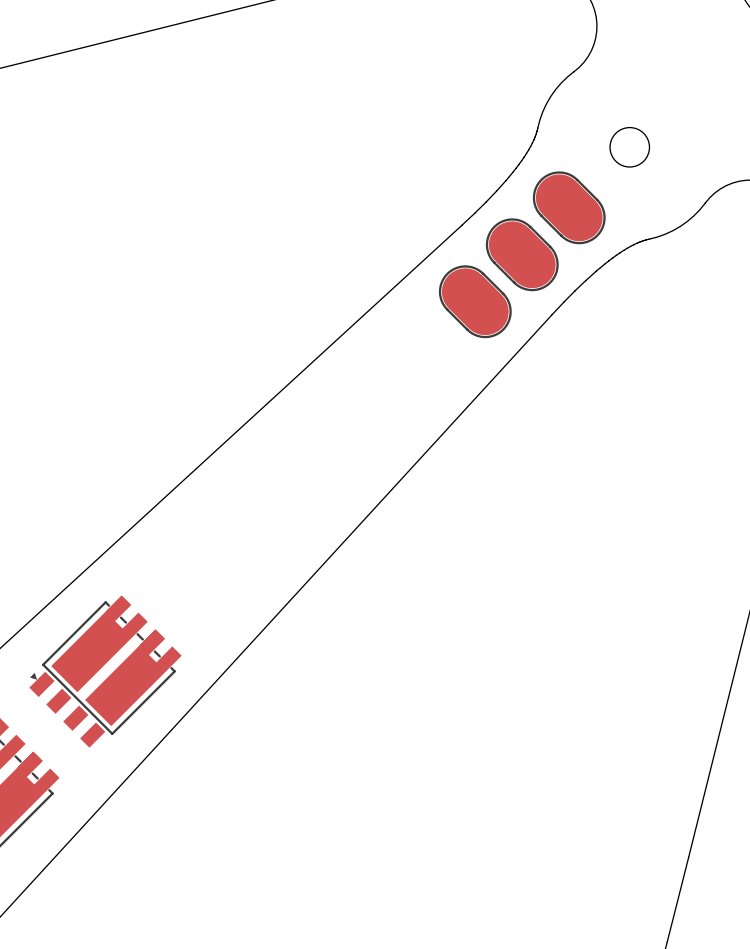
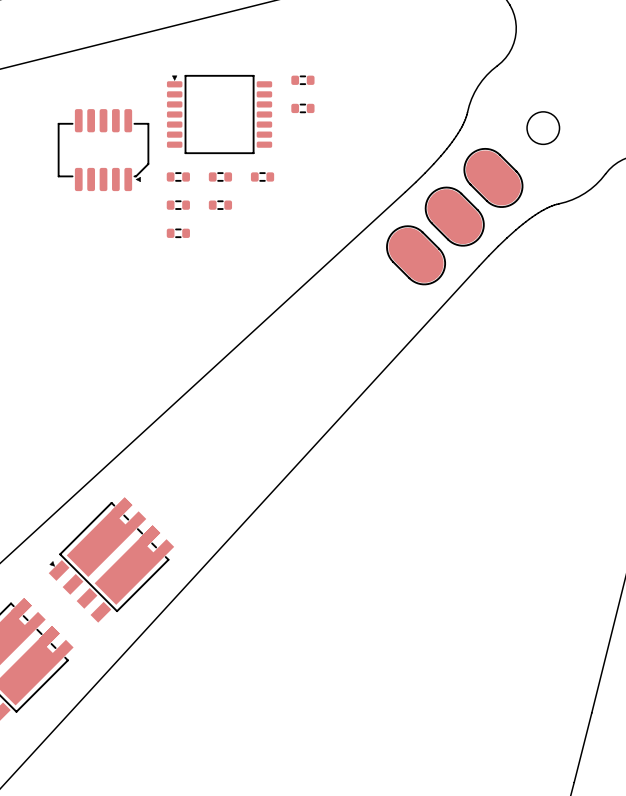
part: none -> (302, 80)
part: none -> (302, 108)
part: none -> (219, 114)
part: none -> (103, 150)
part: none -> (178, 176)
part: none -> (220, 176)
part: none -> (262, 176)
part: none -> (178, 205)
part: none -> (220, 205)
part: none -> (178, 233)

